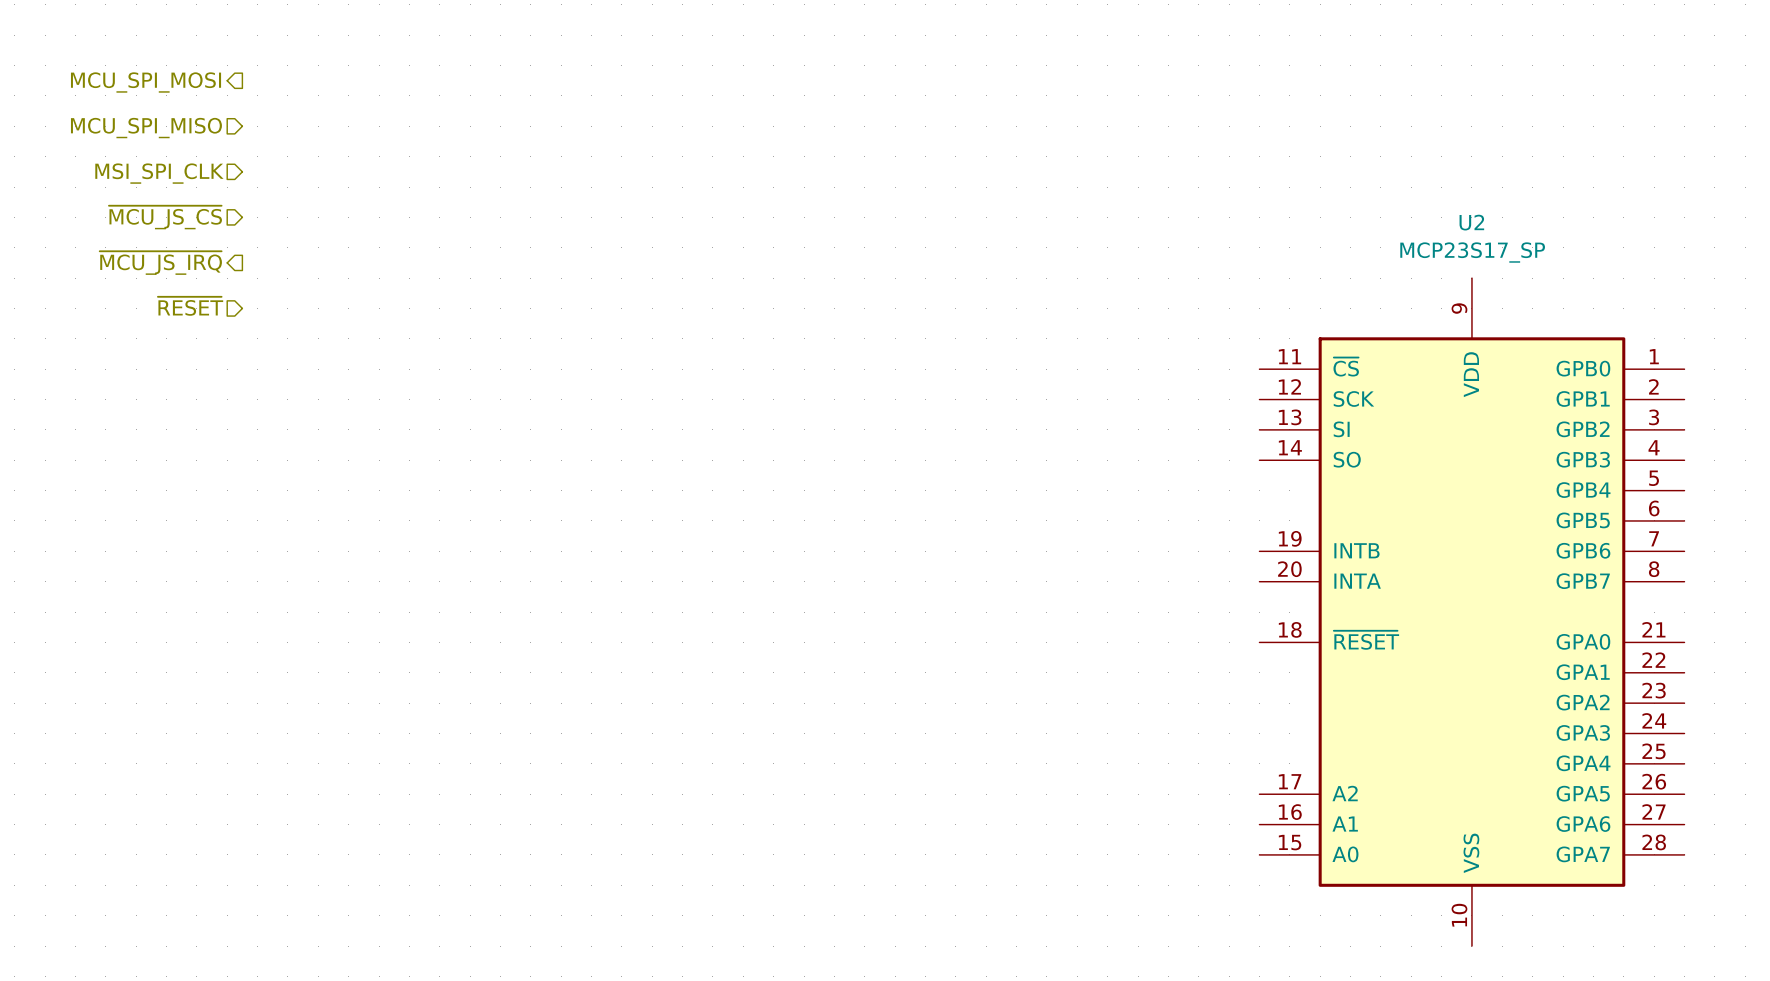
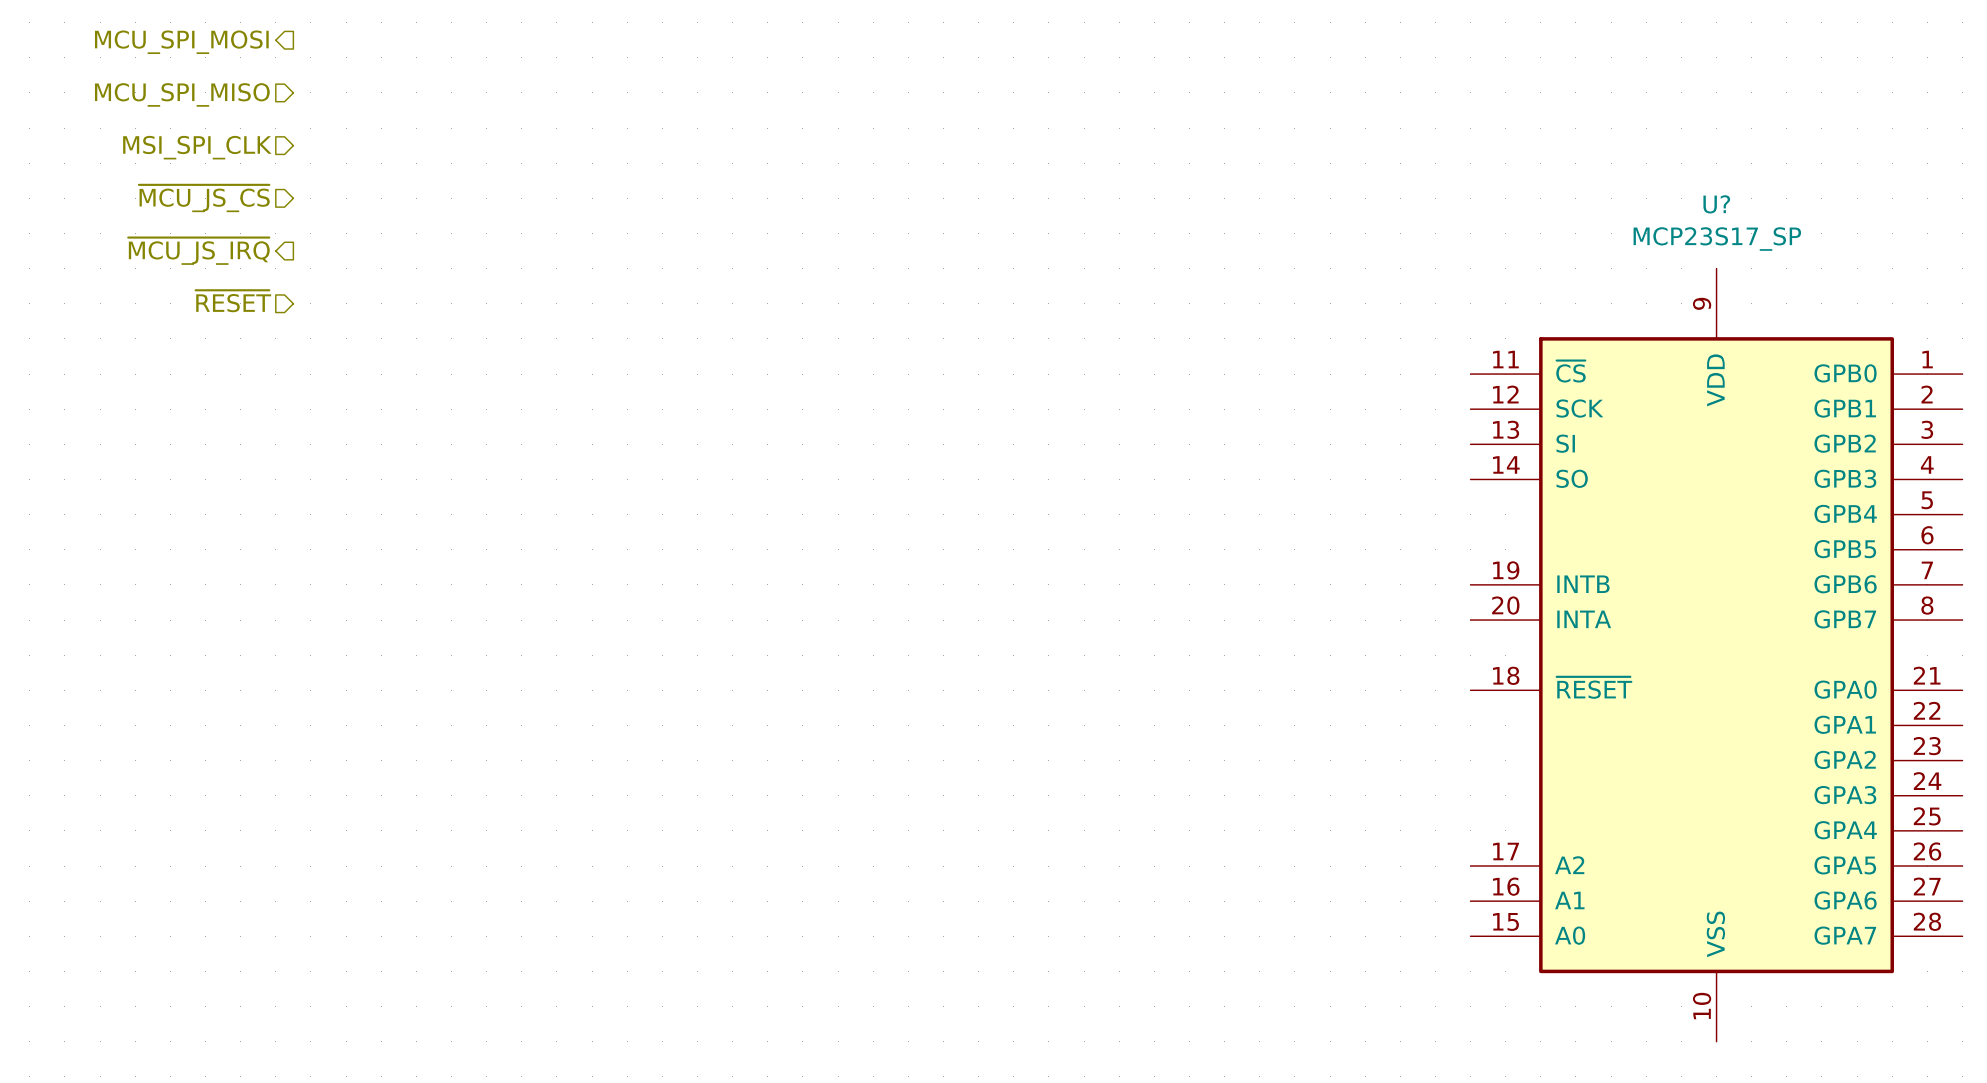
U2 name: U2 (1471, 222) -> U? (1716, 204)

